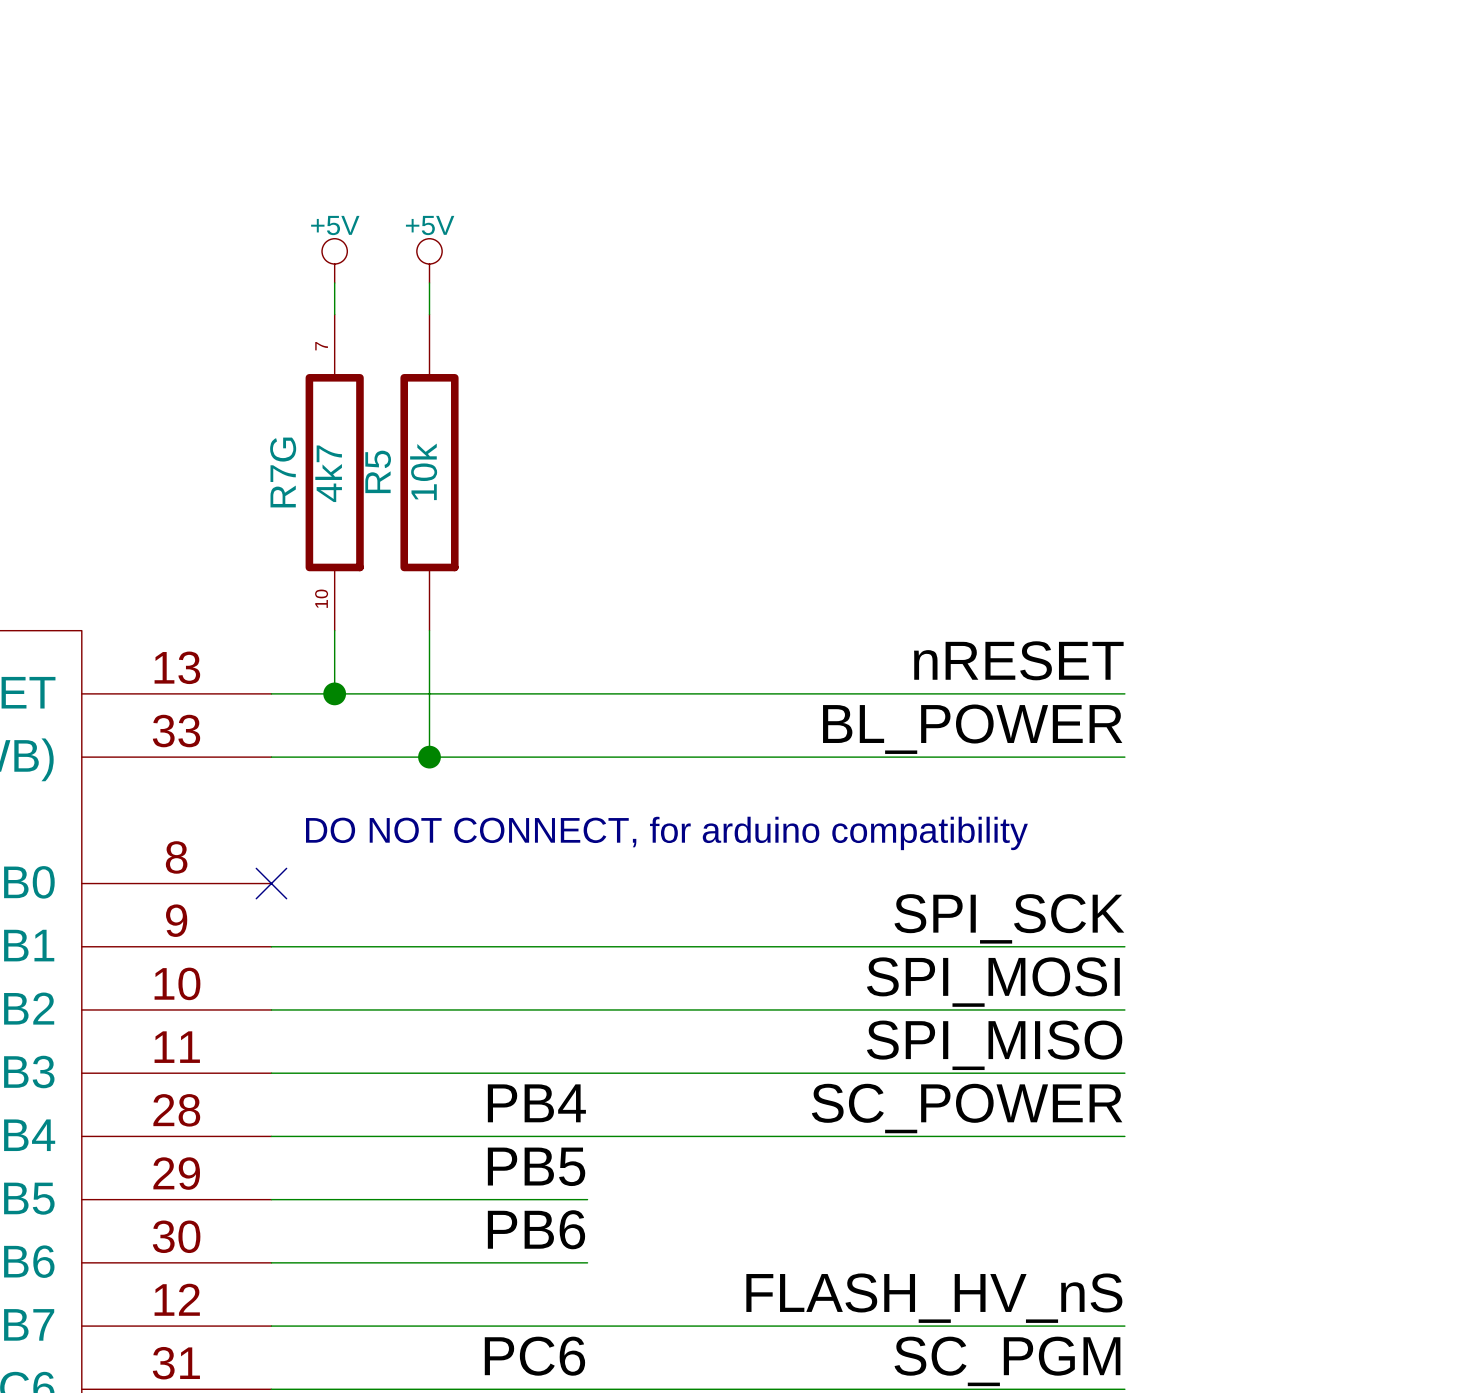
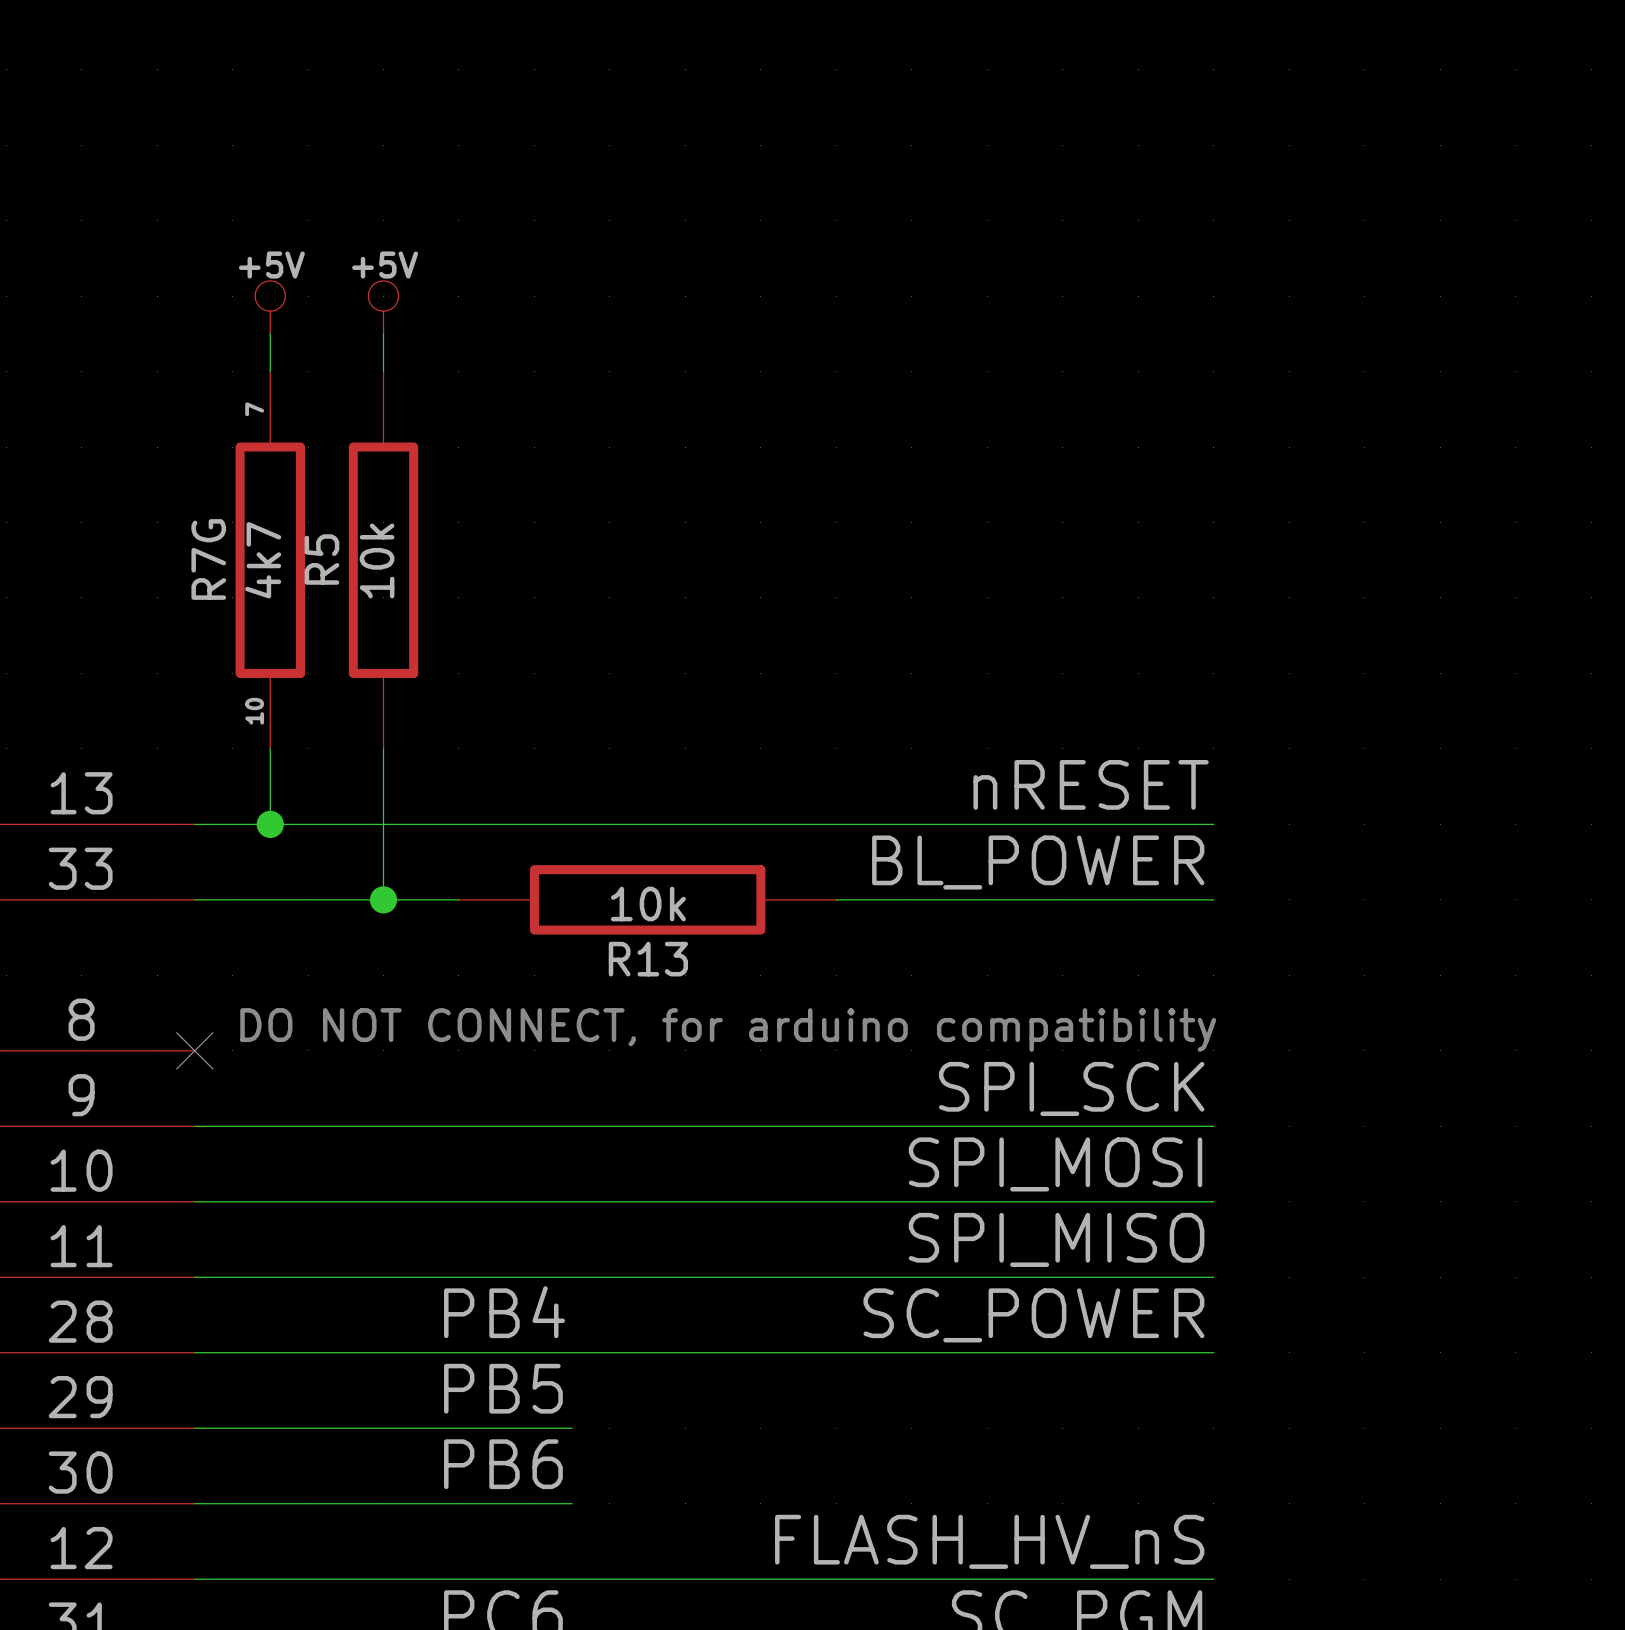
wire: (492, 757) (808, 757) -> none
R13: none -> 10k (647, 899)
text position: DO NOT CONNECT, for arduino compatibility (666, 833) -> DO NOT CONNECT, for arduino compatibility (728, 1029)

